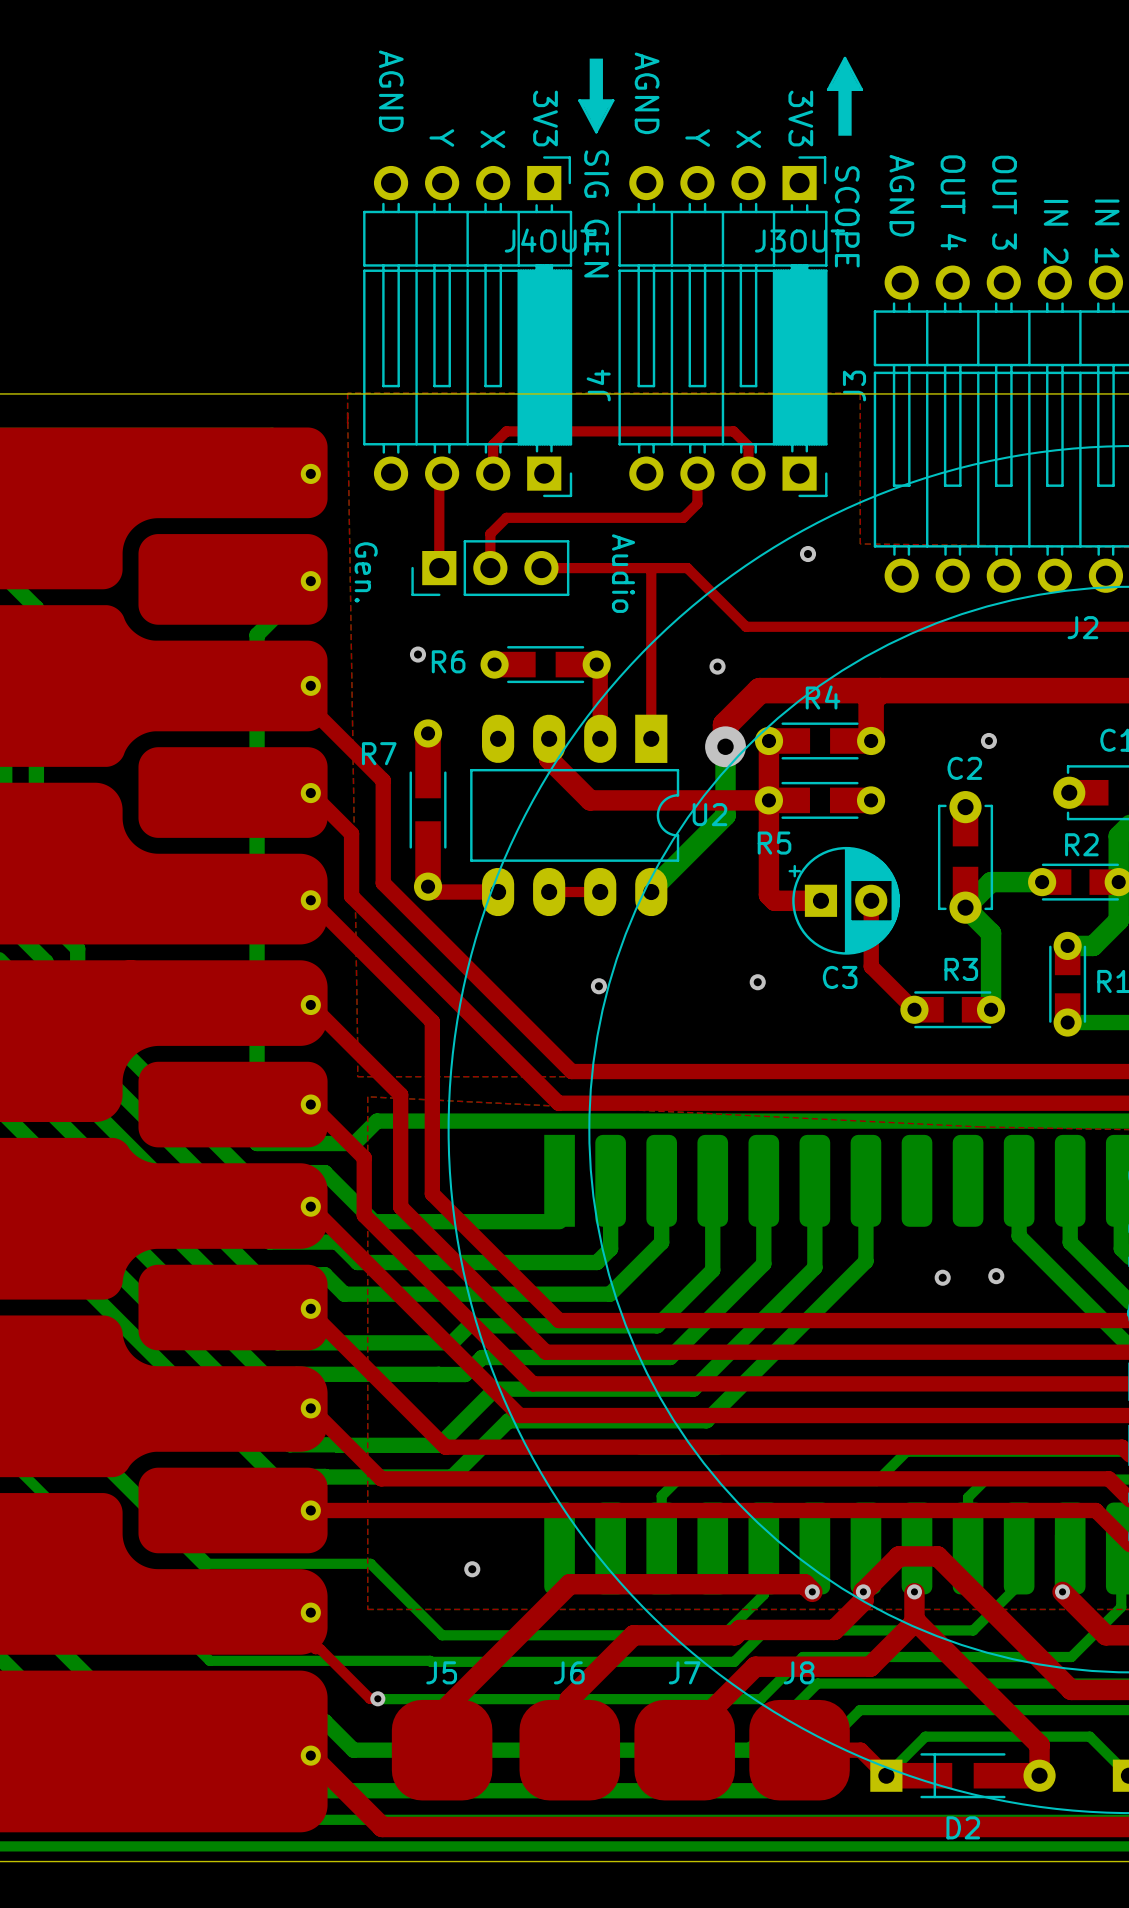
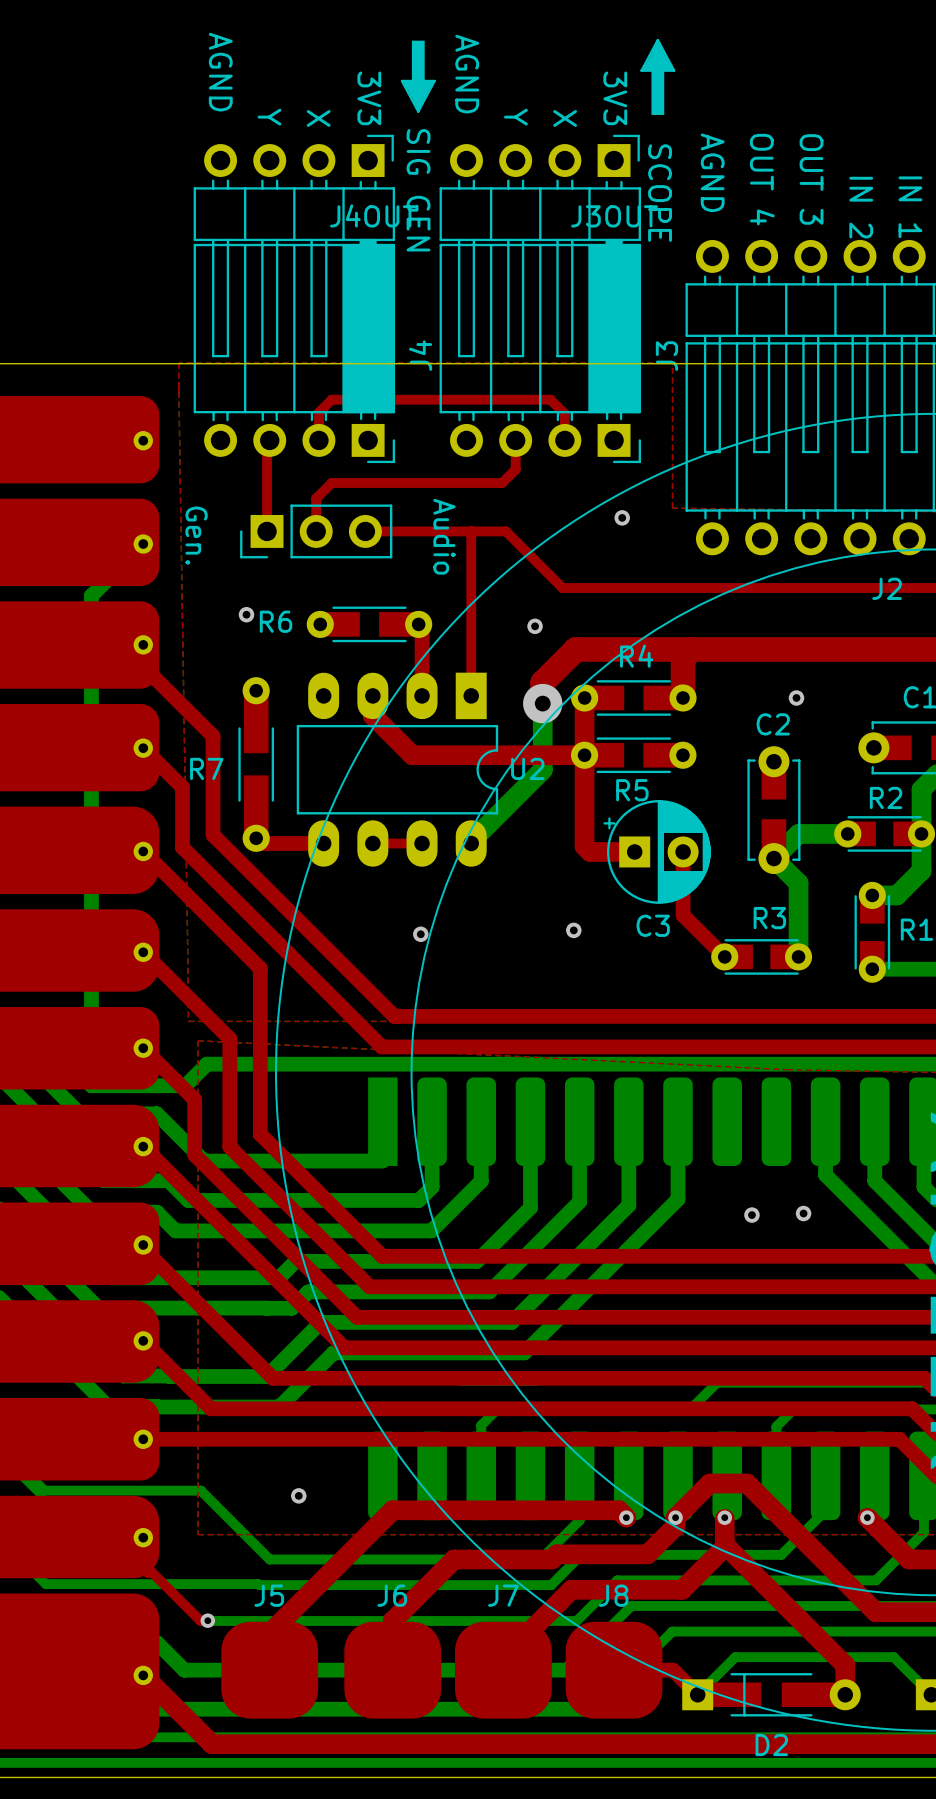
R7 name position: R7 (379, 753) -> R7 (206, 768)
R5 name position: R5 (774, 843) -> R5 (632, 790)

